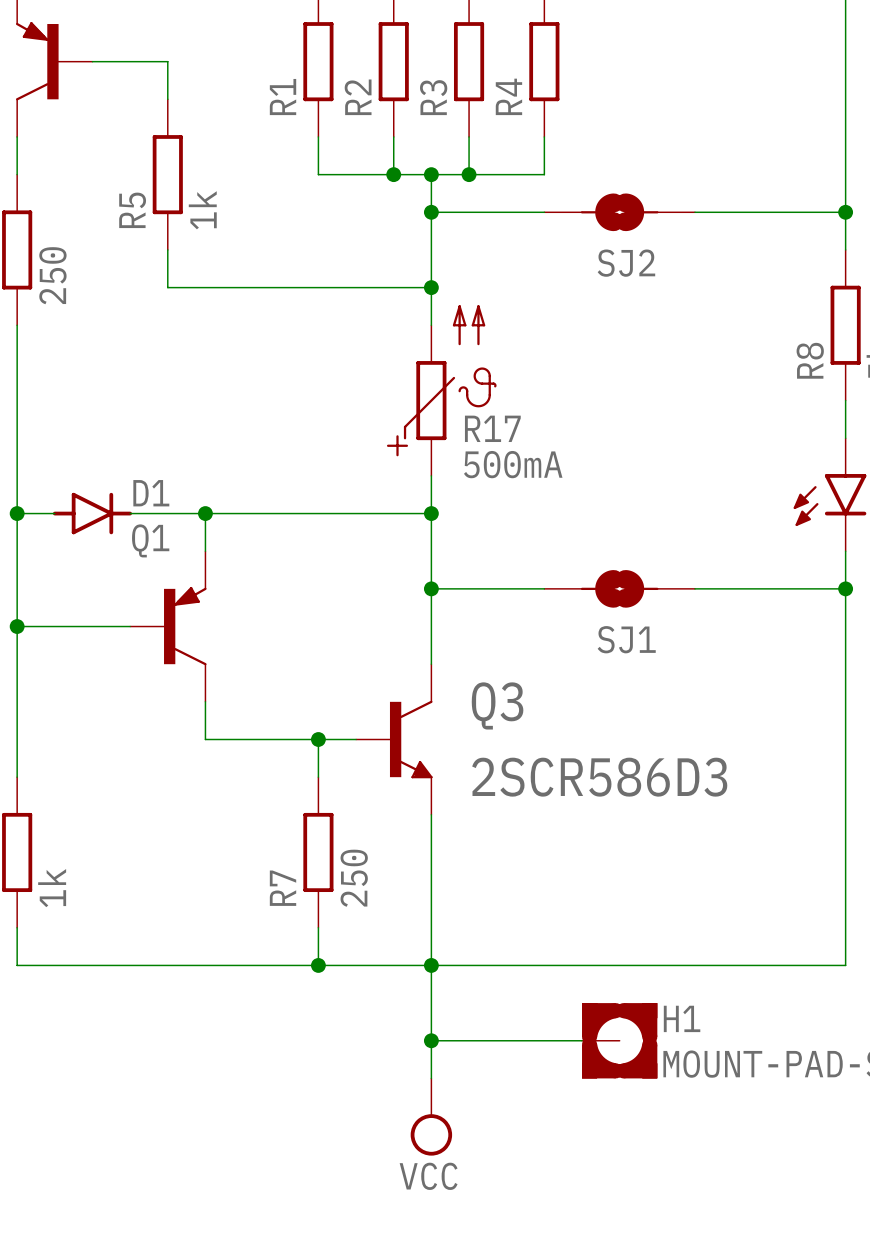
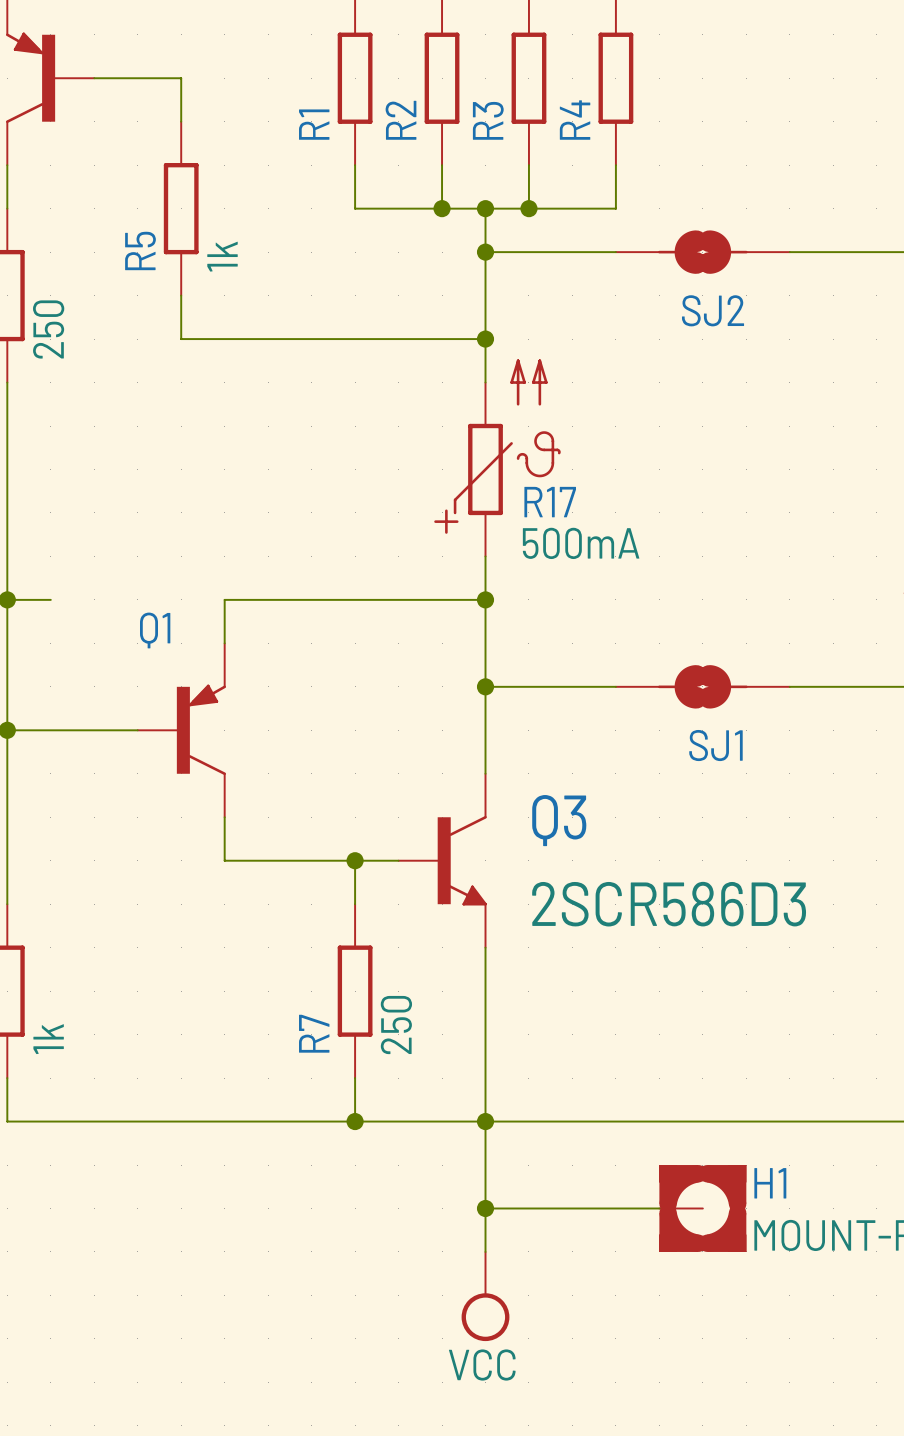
D1: (92, 513) -> none
wire: (130, 513) (205, 513) -> none
junction: (205, 513) -> none

